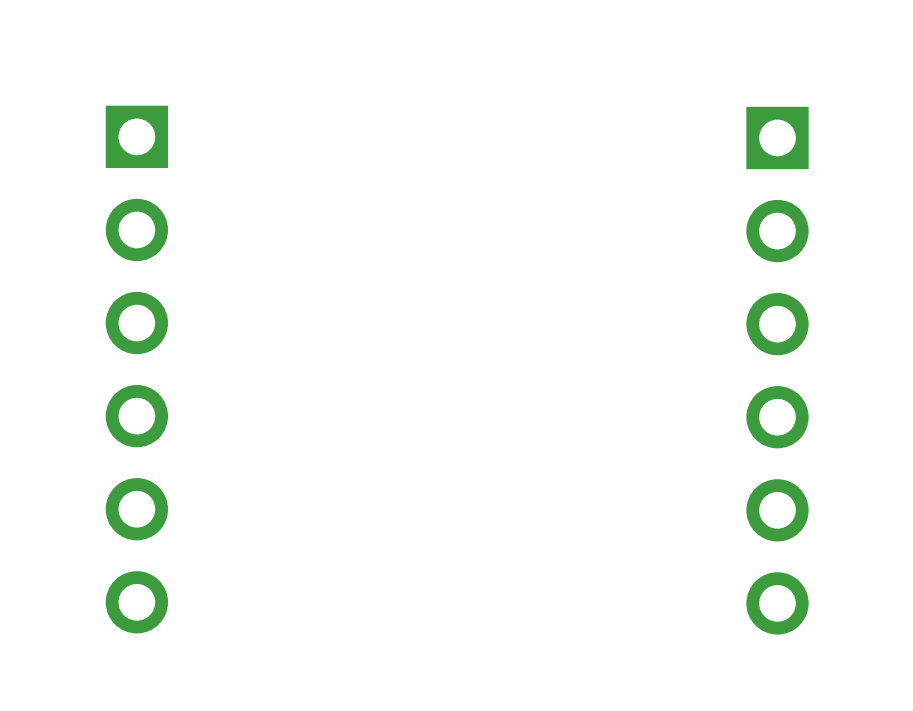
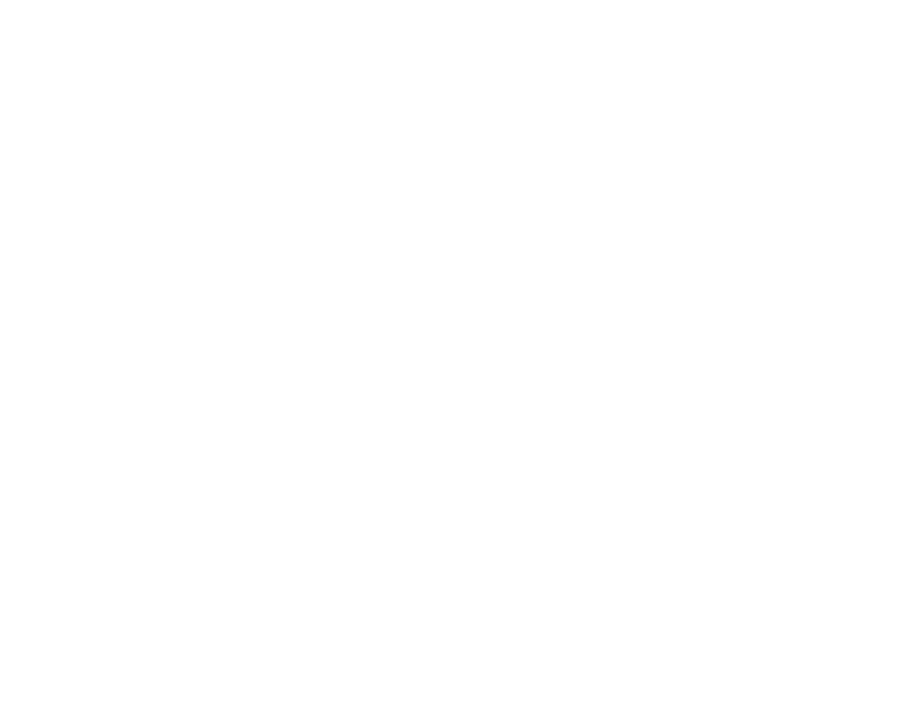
part: (136, 369) -> none
part: (777, 370) -> none

